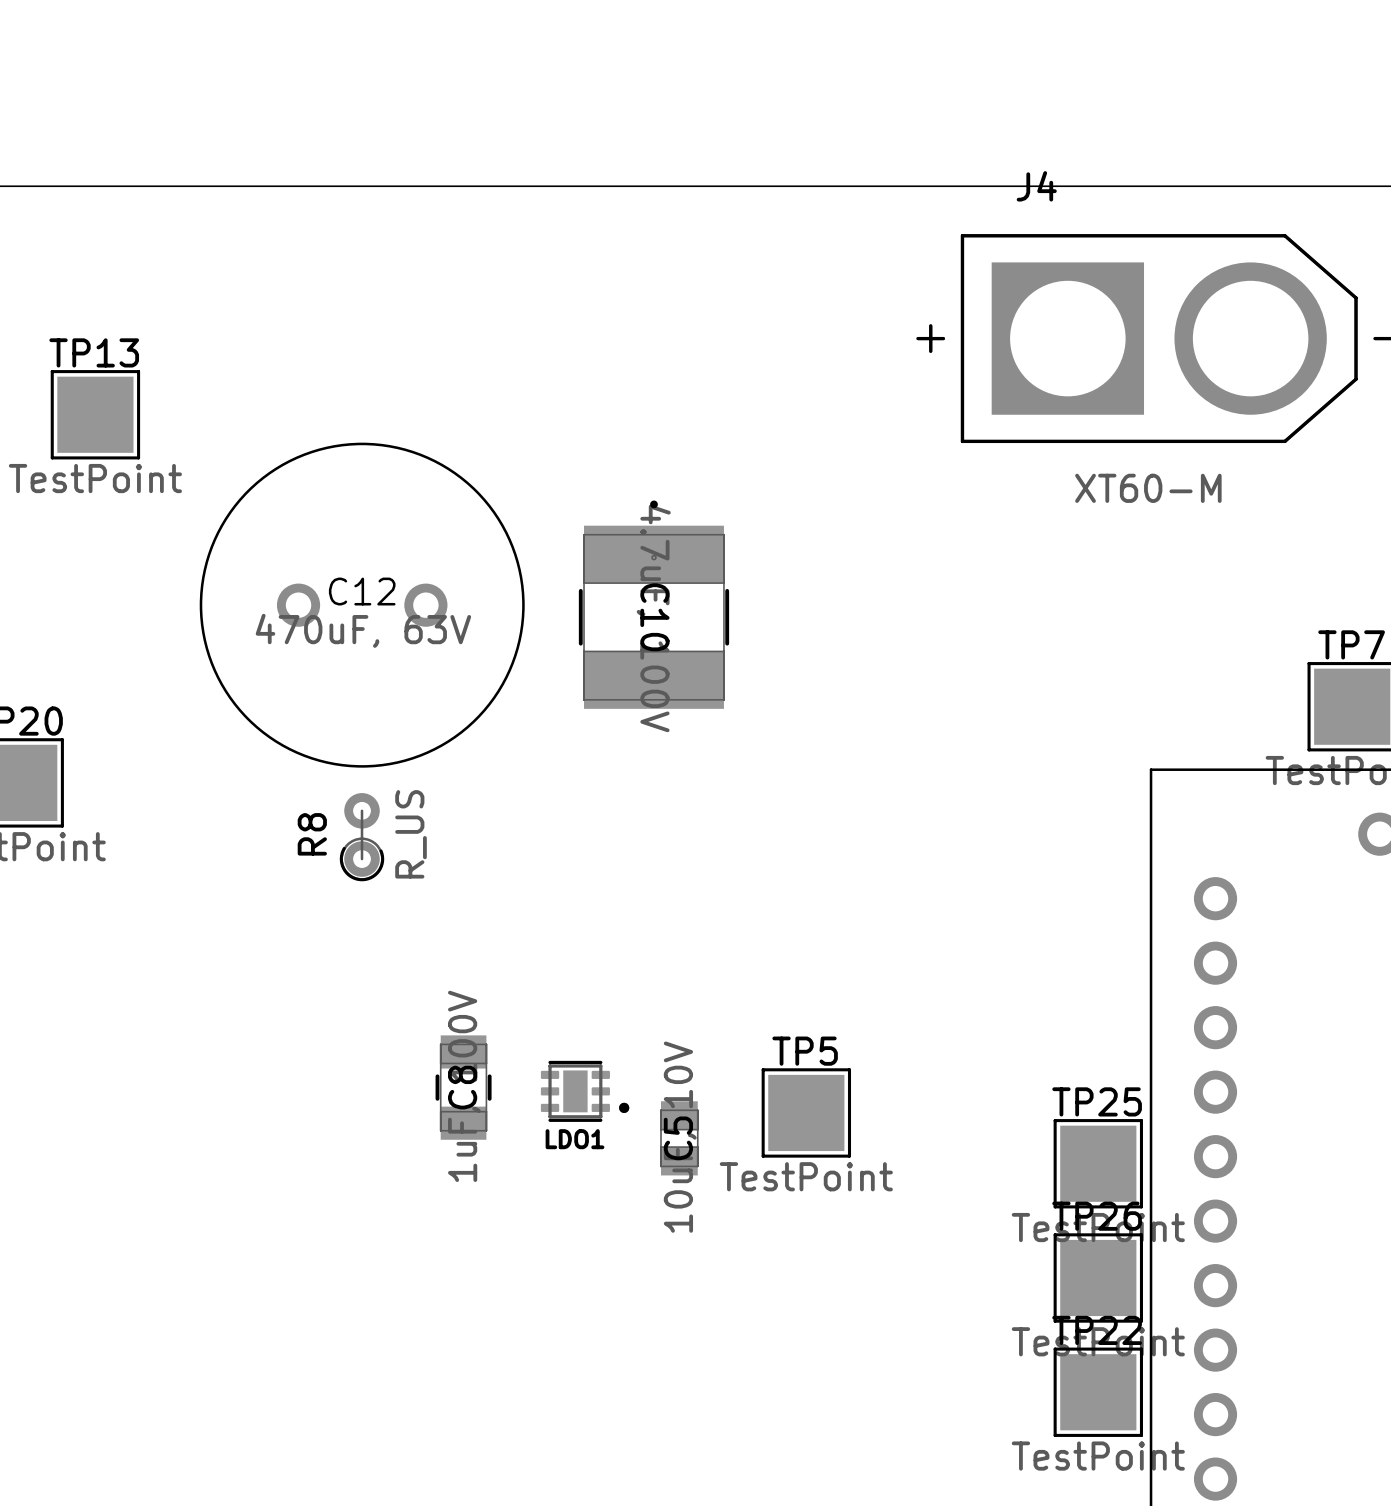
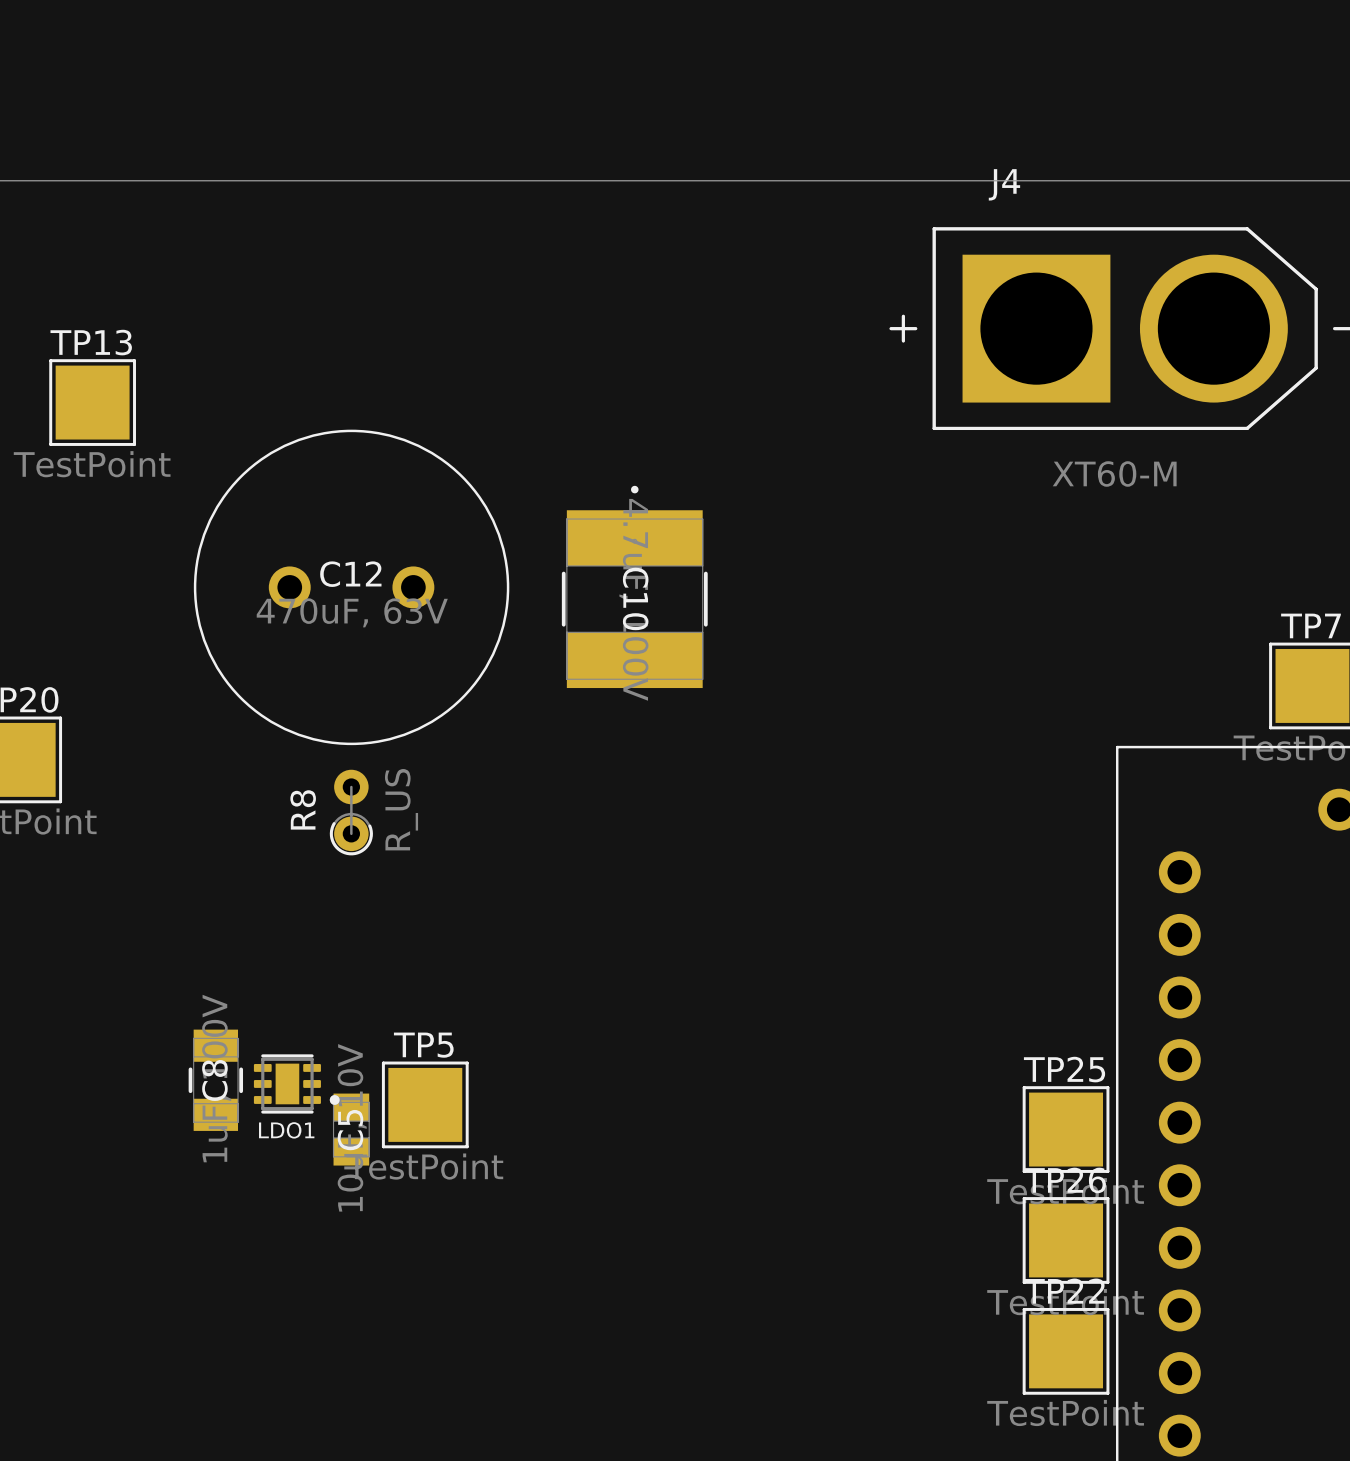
C8 position: (463, 1087) -> (215, 1080)
LDO1 position: (585, 1091) -> (296, 1083)
TP5 position: (806, 1112) -> (425, 1104)
C5 position: (679, 1138) -> (351, 1129)

